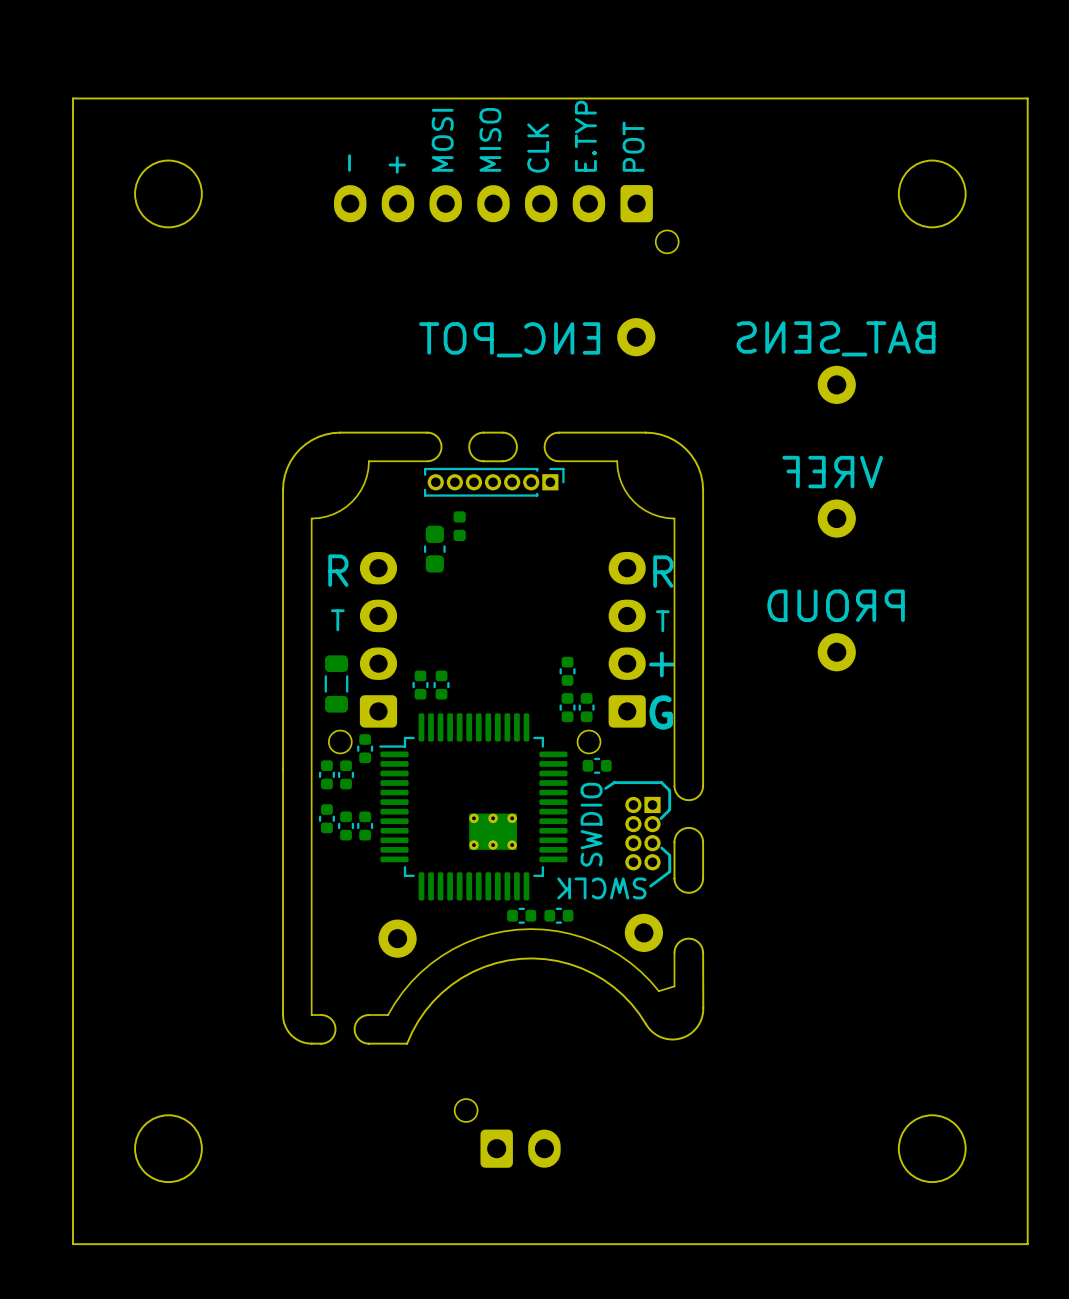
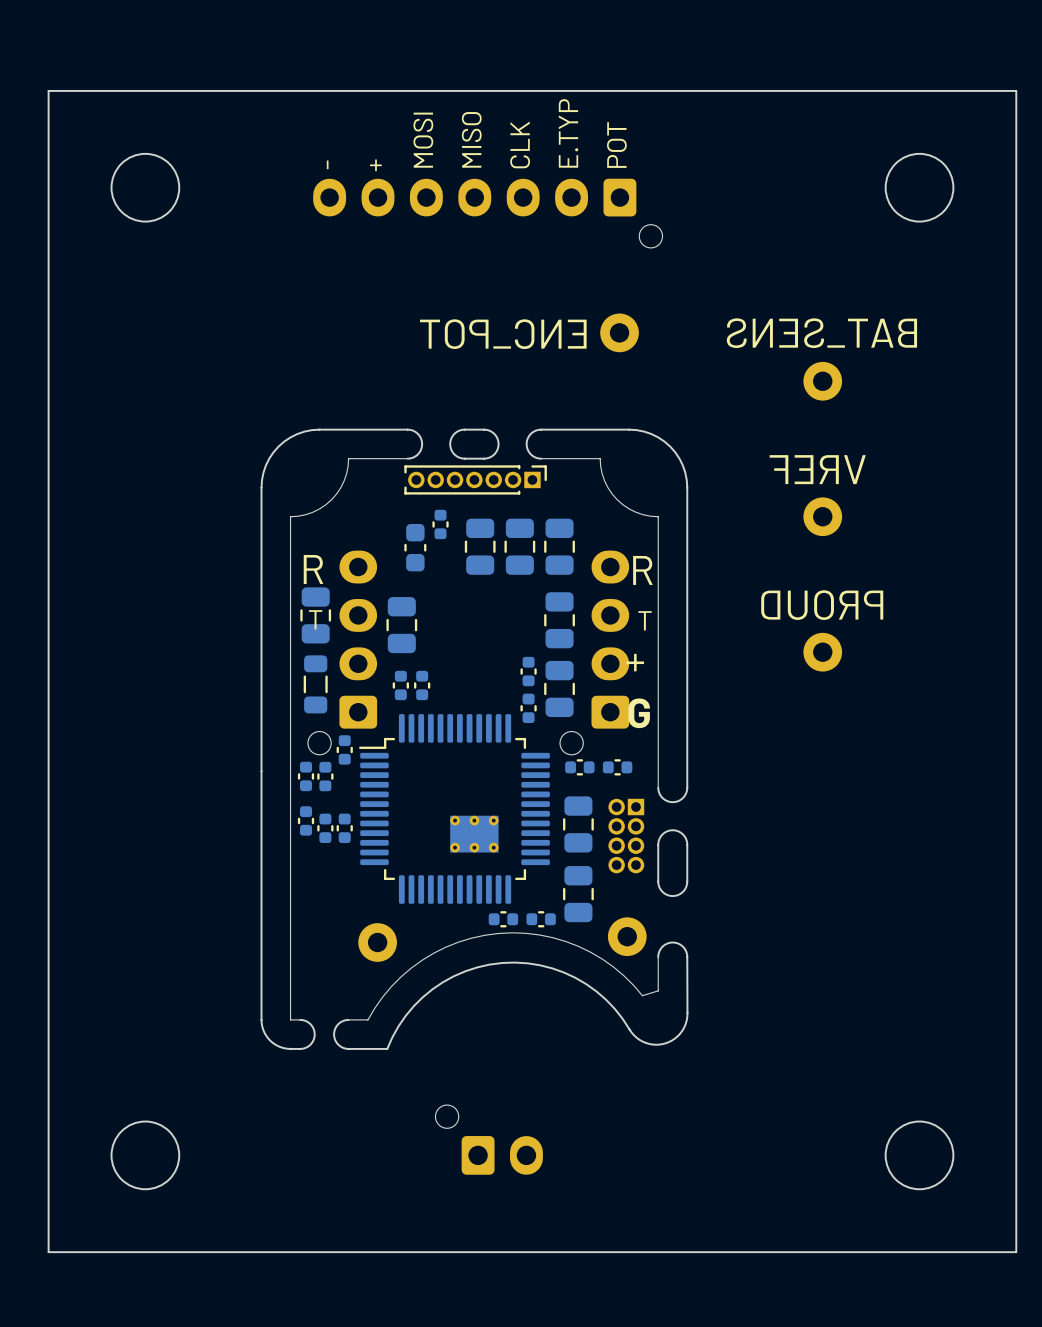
part footprint: [453, 511, 466, 542] -> [432, 509, 449, 540]
part: none -> (480, 546)
part: none -> (519, 546)
part: none -> (559, 546)
part: none -> (315, 615)
part: none -> (559, 620)
part: none -> (401, 625)
part: none -> (528, 671)
part: (567, 671) -> none
part: none -> (559, 688)
part: none -> (528, 708)
part: (567, 707) -> none
part: (586, 707) -> none
part: none -> (617, 767)
line: (605, 788) (614, 782) (661, 782) (669, 790) (669, 809) (660, 818) -> none
part: none -> (578, 824)
text: SWDIO (591, 824) -> none
line: (661, 847) (669, 855) (669, 871) (650, 886) -> none
text: SWCLK (601, 888) -> none
part: none -> (578, 894)

